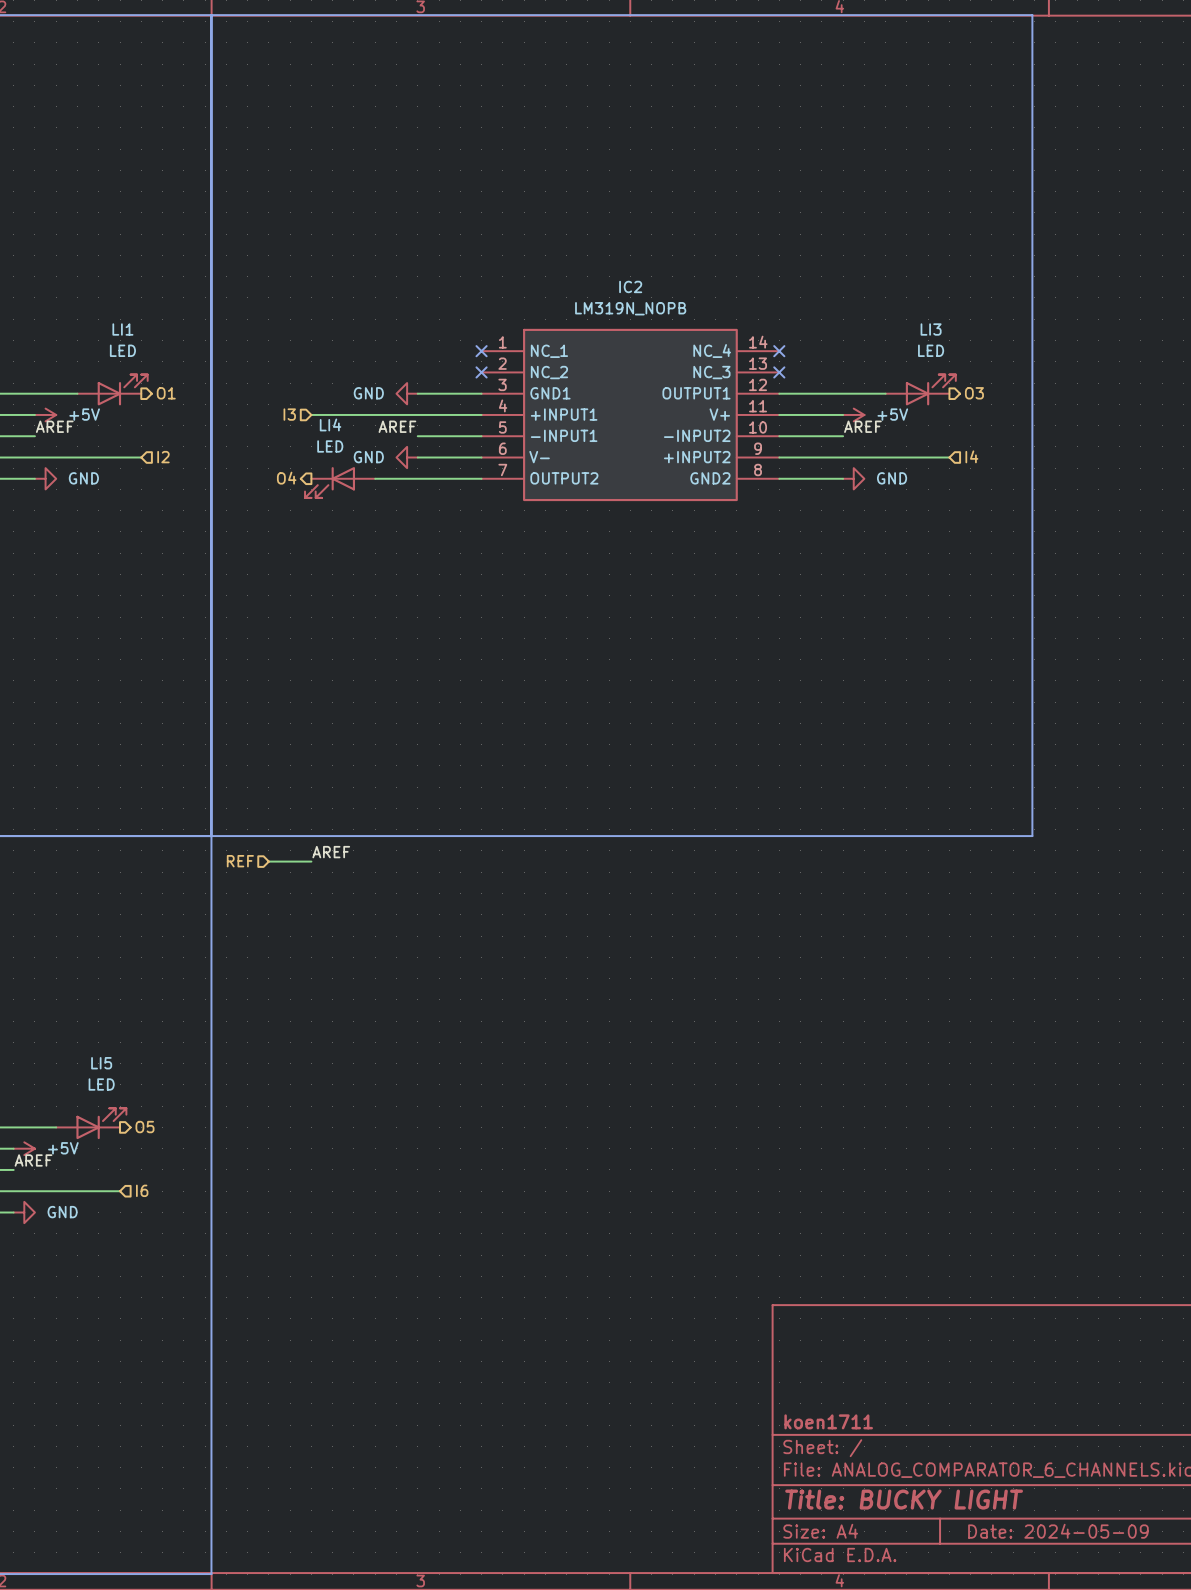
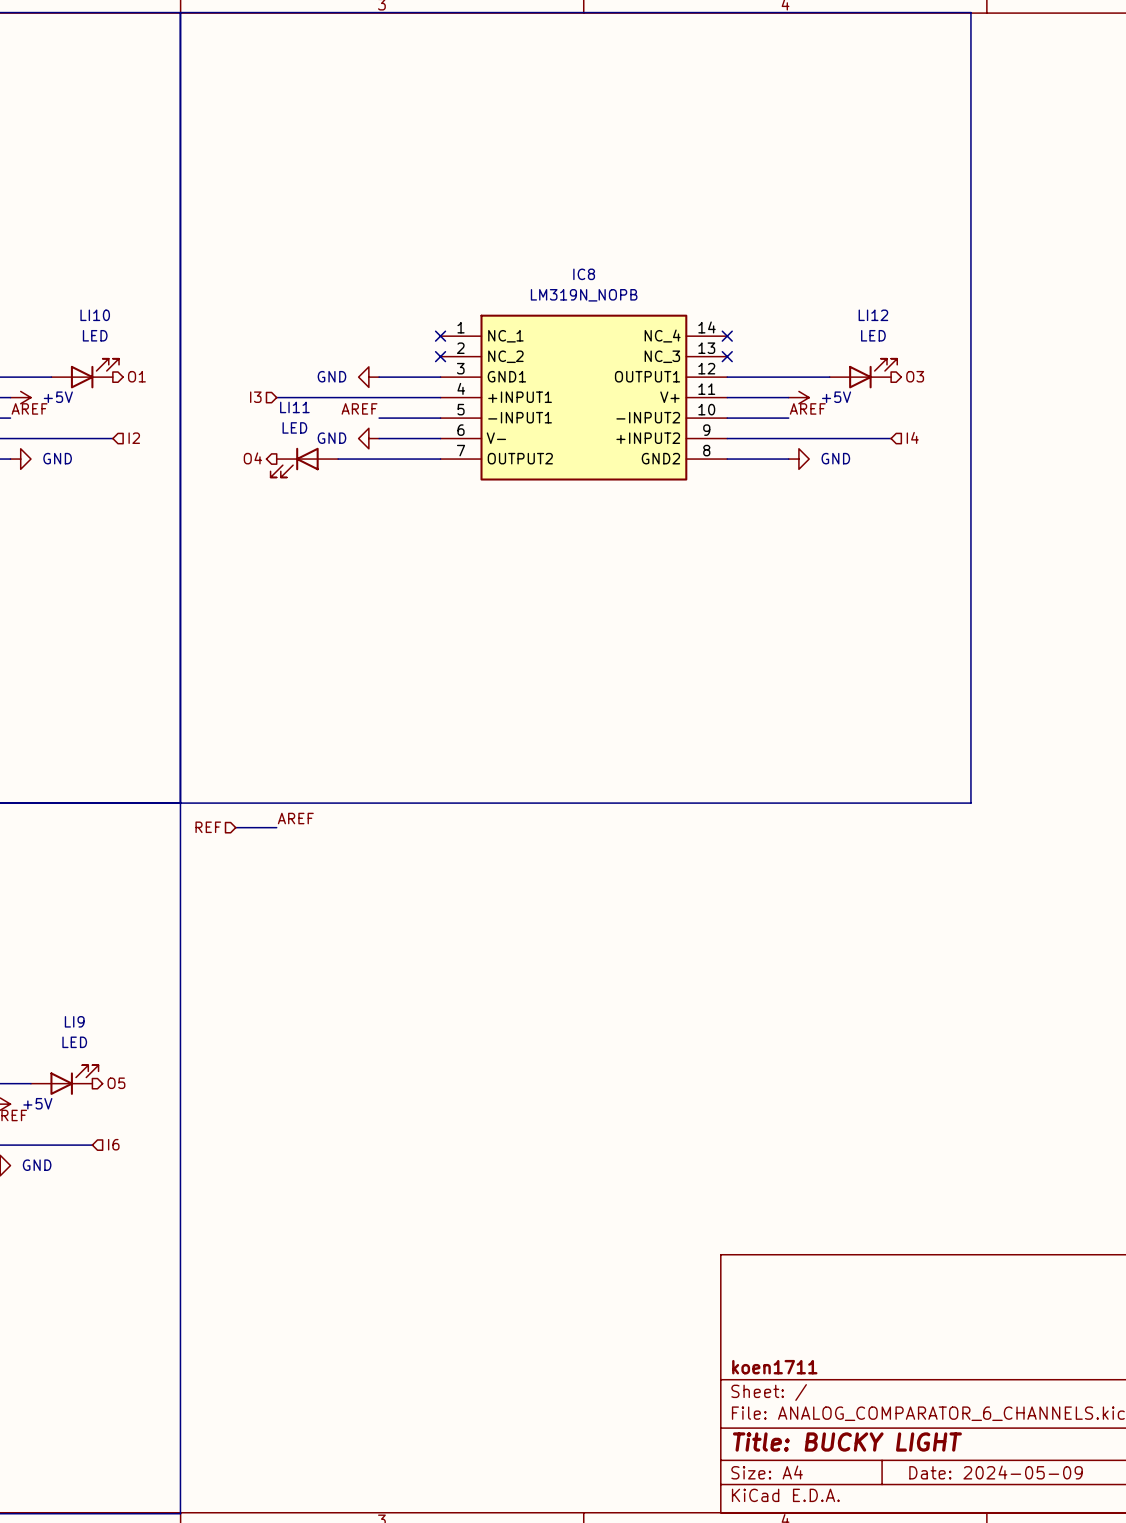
IC2 name: IC2 (630, 286) -> IC8 (584, 274)
LI1 name: LI1 (122, 329) -> LI10 (95, 315)
LI3 name: LI3 (931, 329) -> LI12 (873, 315)
LI4 name: LI4 (330, 424) -> LI11 (294, 407)
LI5 name: LI5 (101, 1063) -> LI9 (74, 1021)

